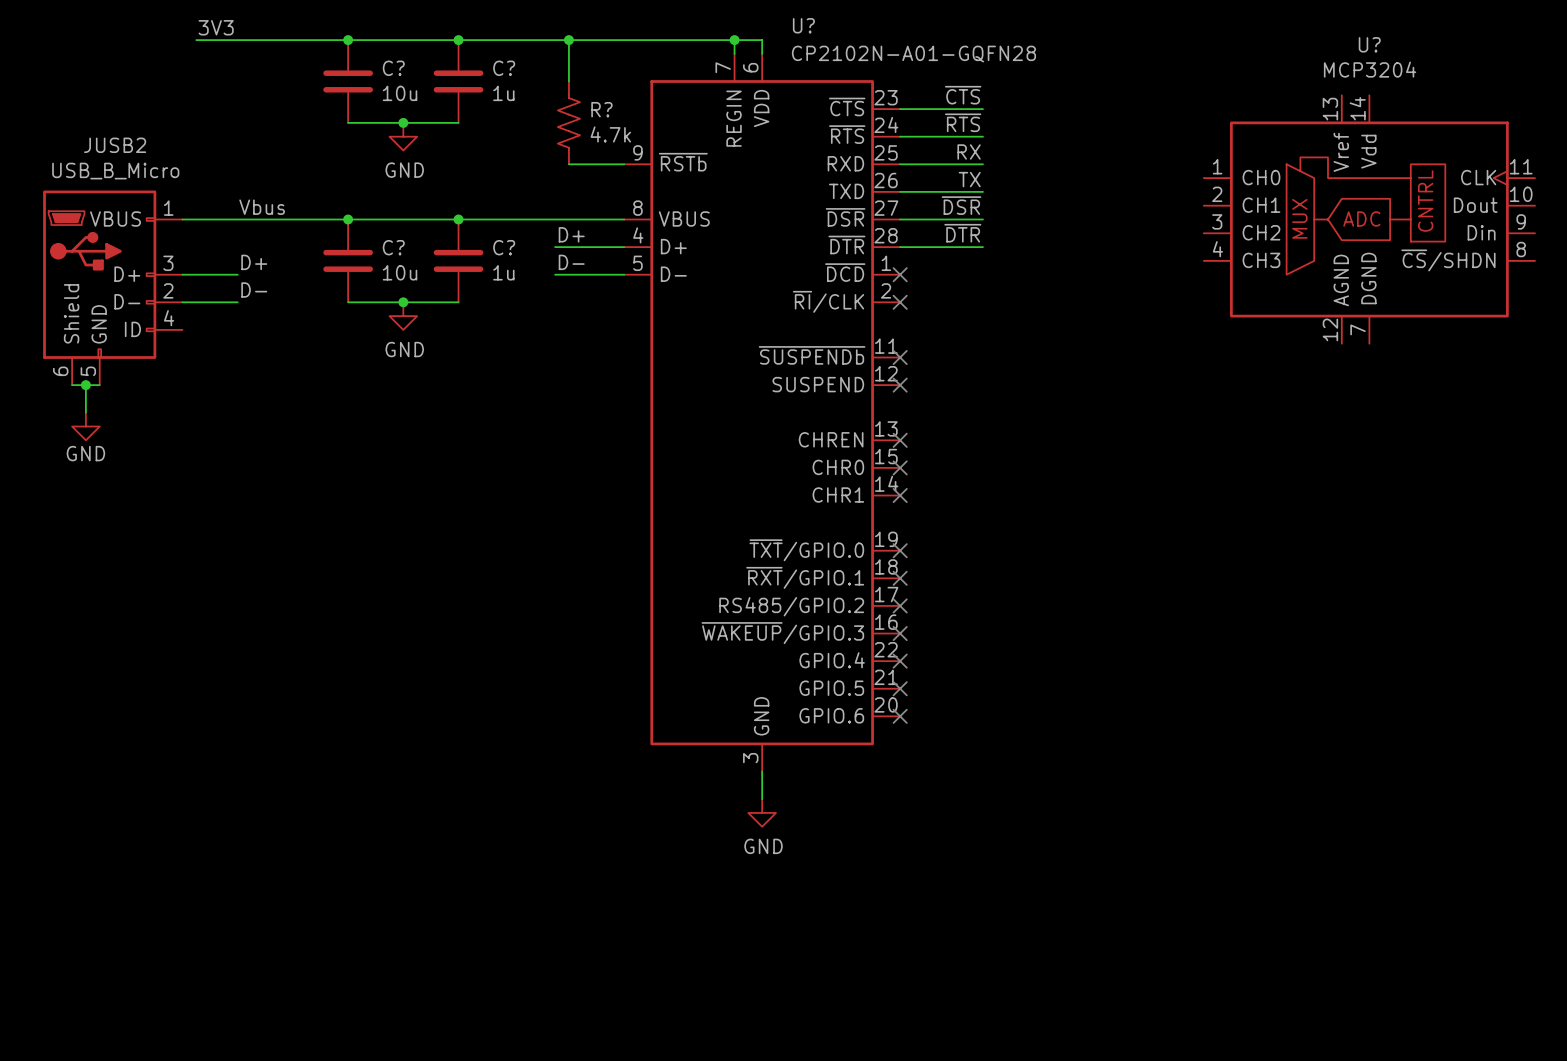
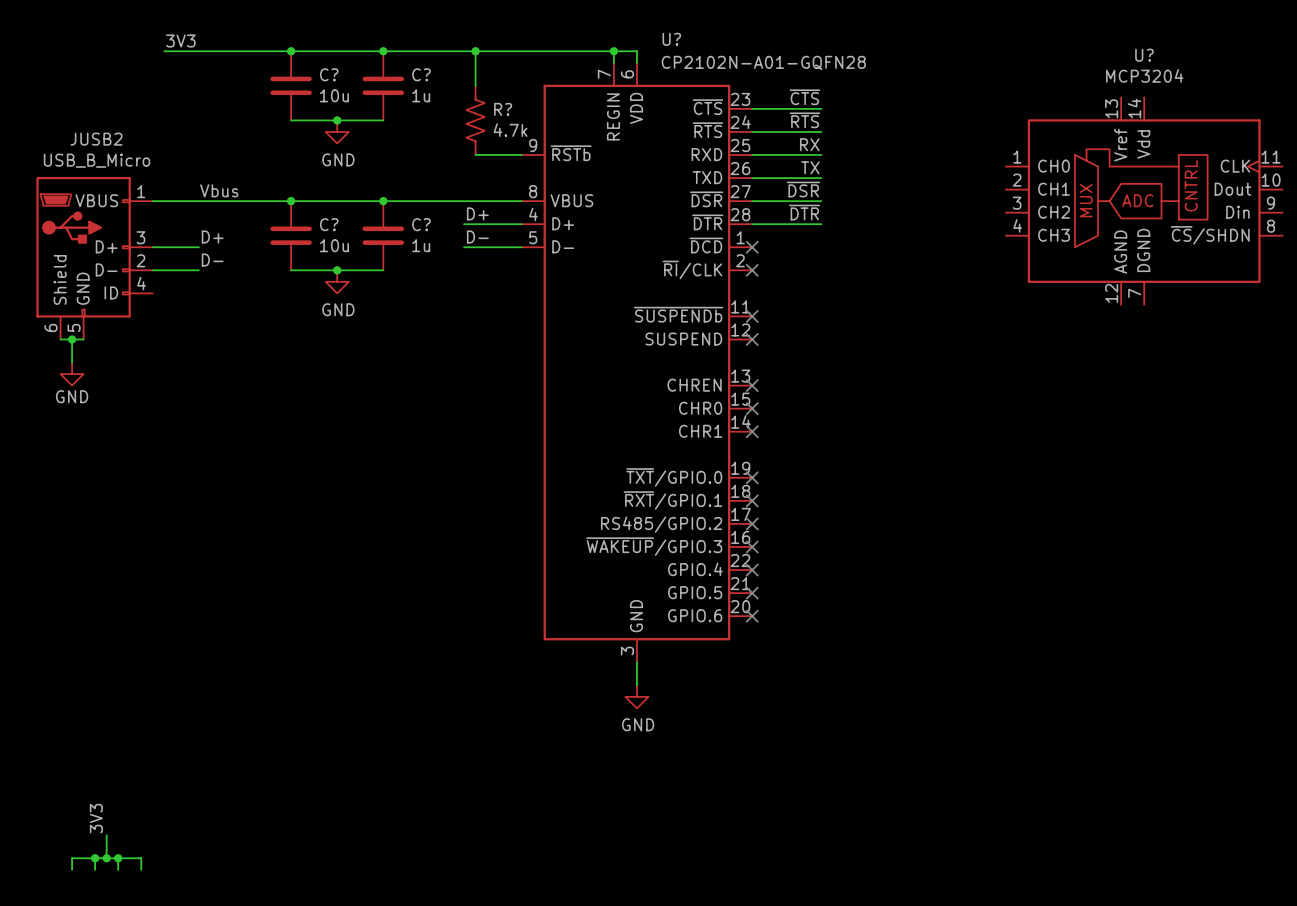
label: none -> 3V3 (96, 818)
wire: none -> (106, 835) (106, 858)
wire: none -> (95, 858) (95, 869)
junction: none -> (95, 858)
junction: none -> (106, 858)
wire: none -> (118, 858) (118, 869)
junction: none -> (118, 858)
wire: none -> (72, 869) (72, 858) (141, 858) (141, 869)

